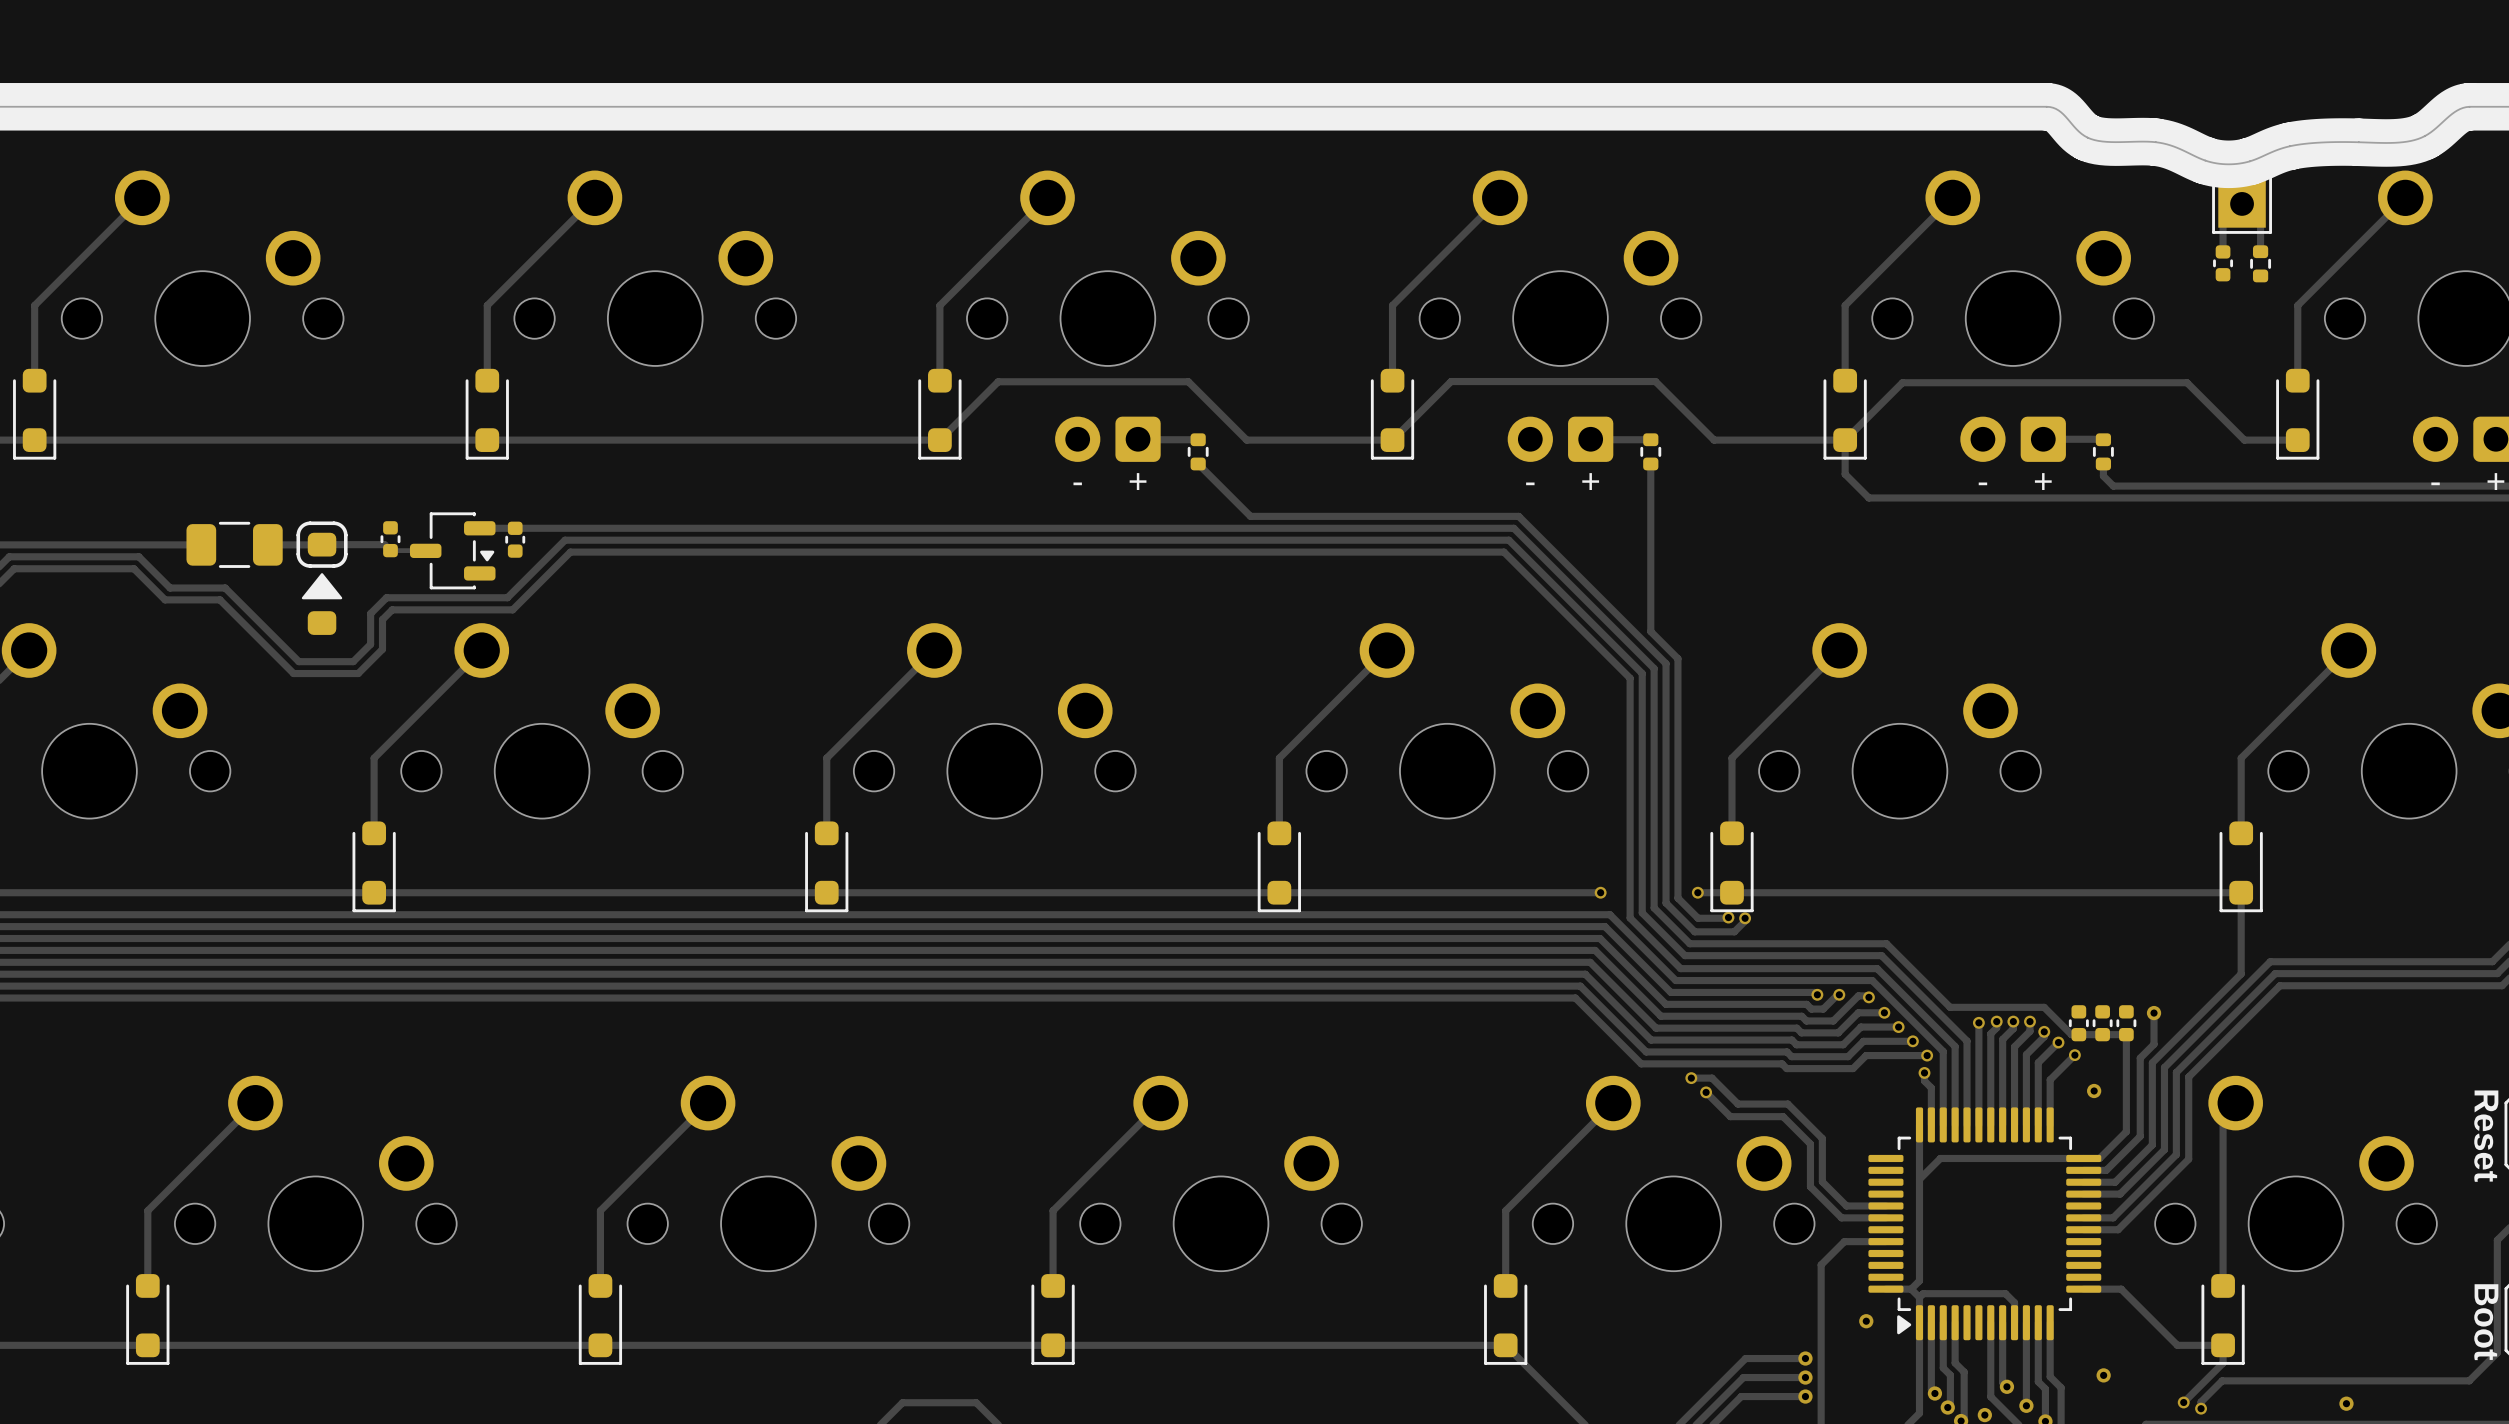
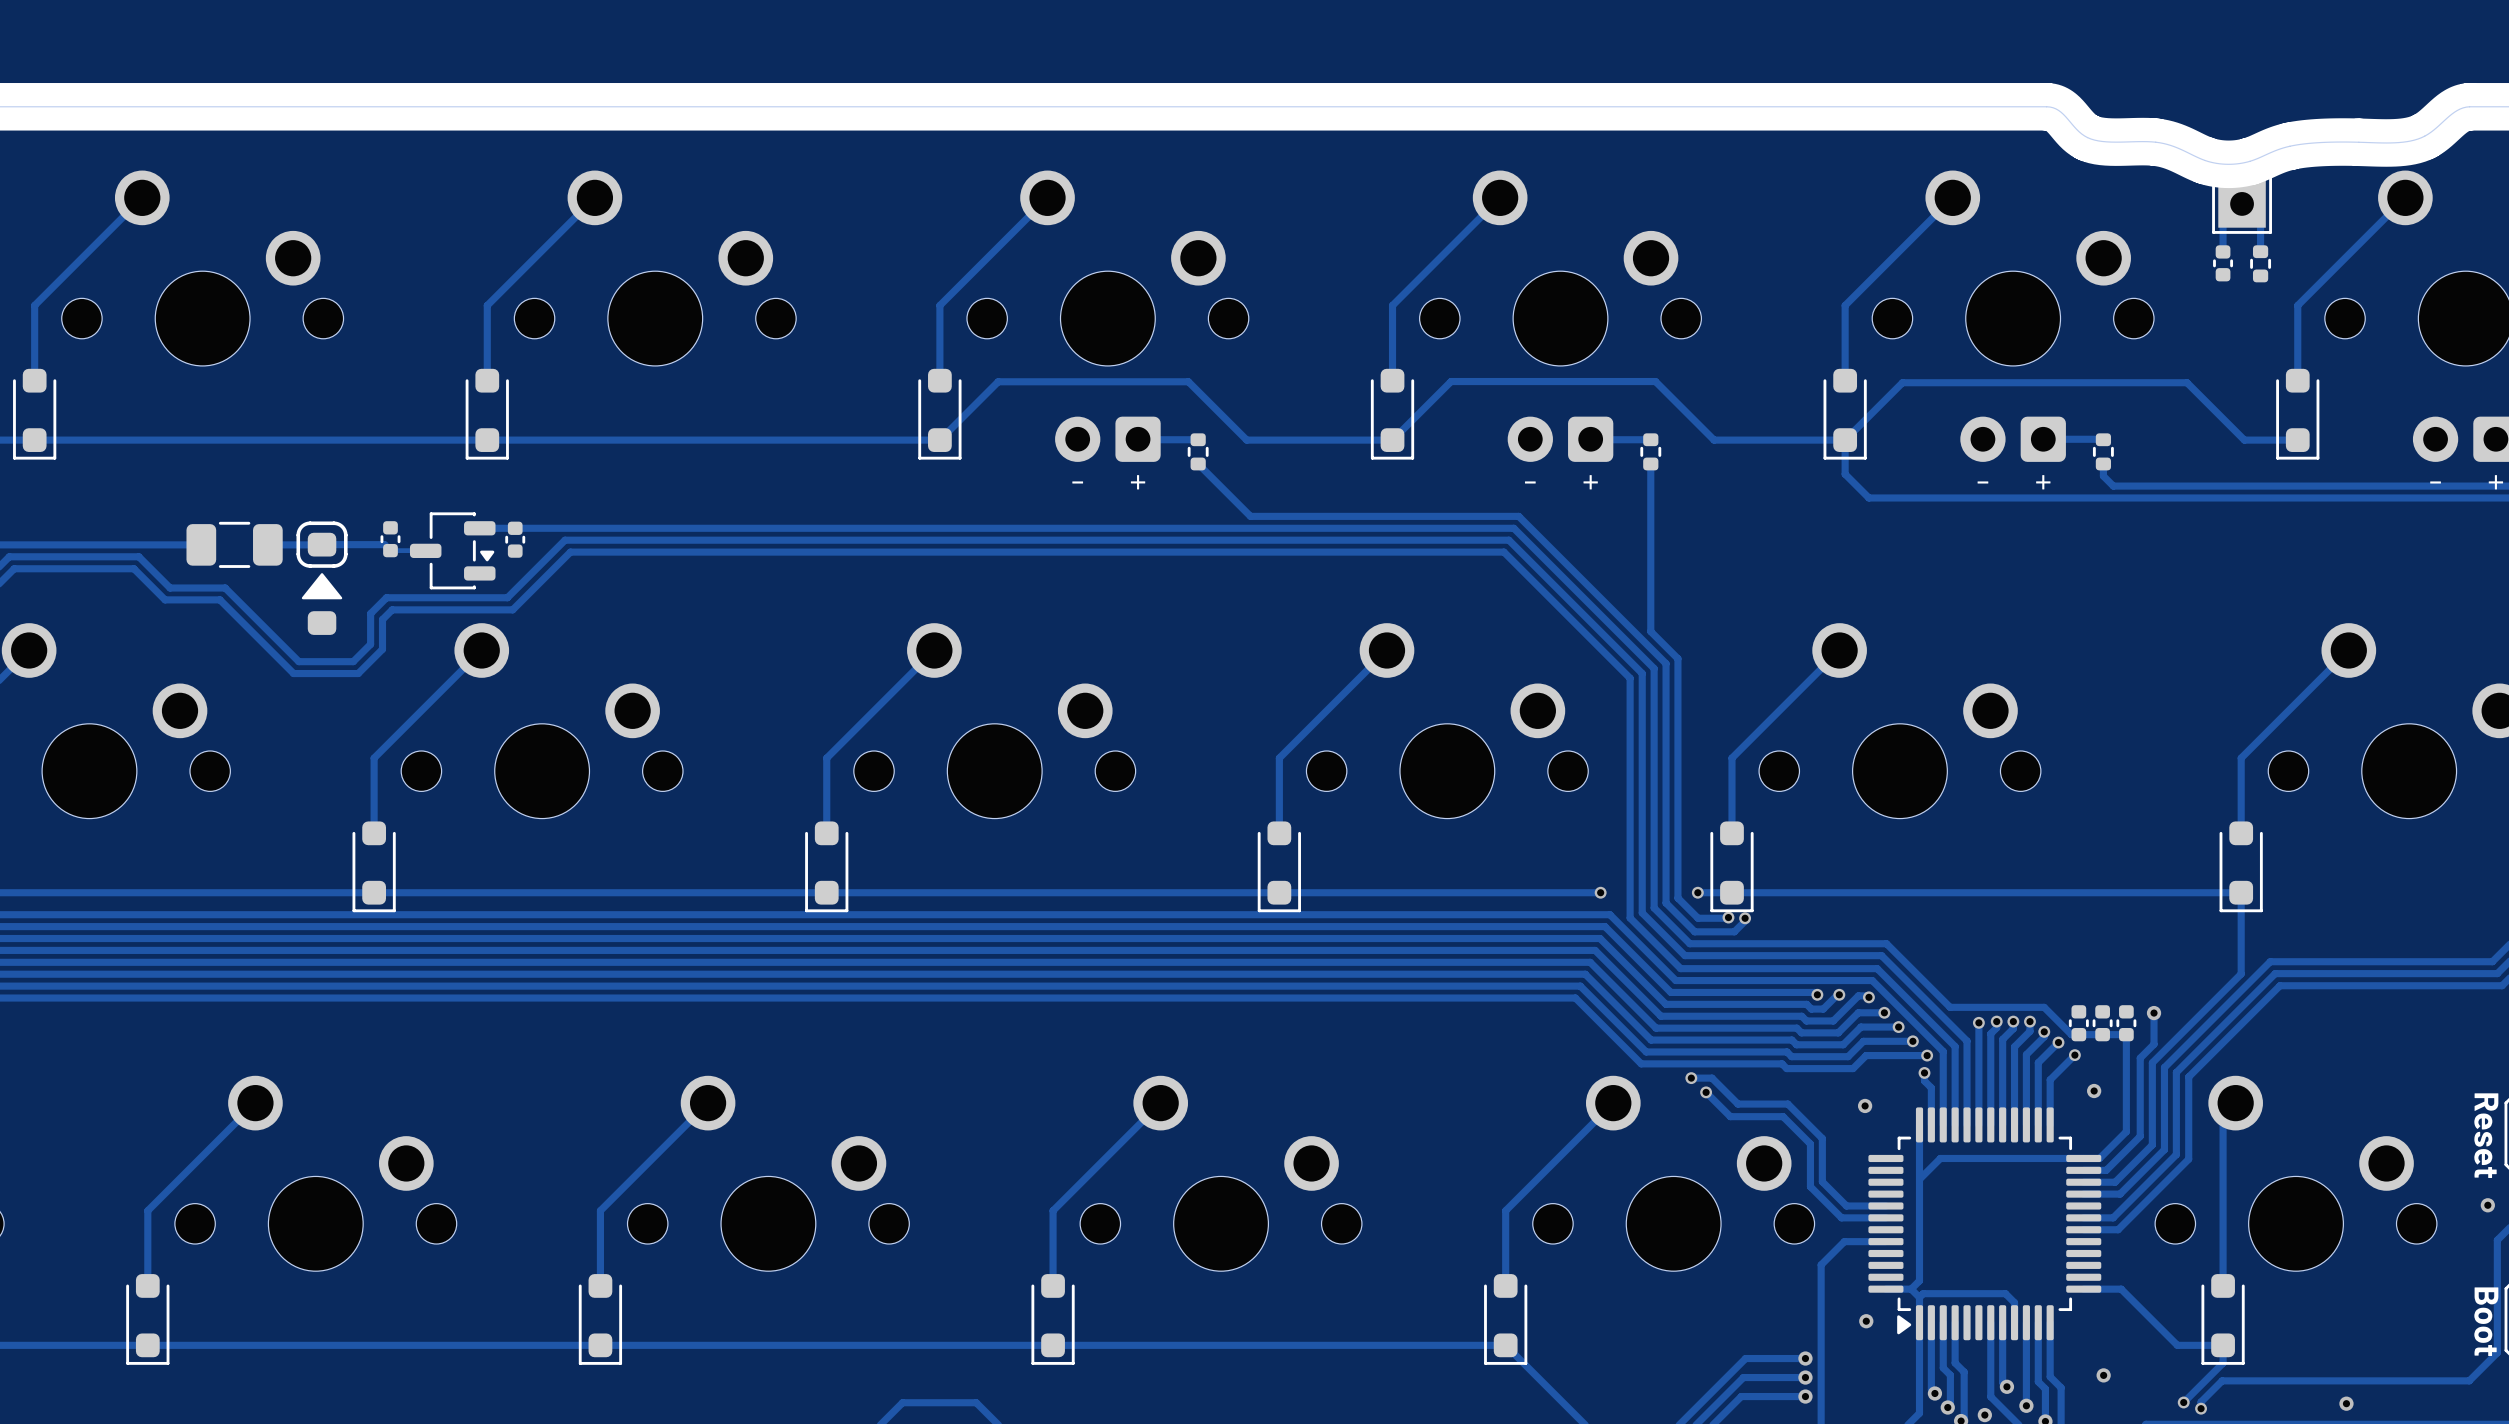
via: none -> (1865, 1105)
via: none -> (2487, 1205)

